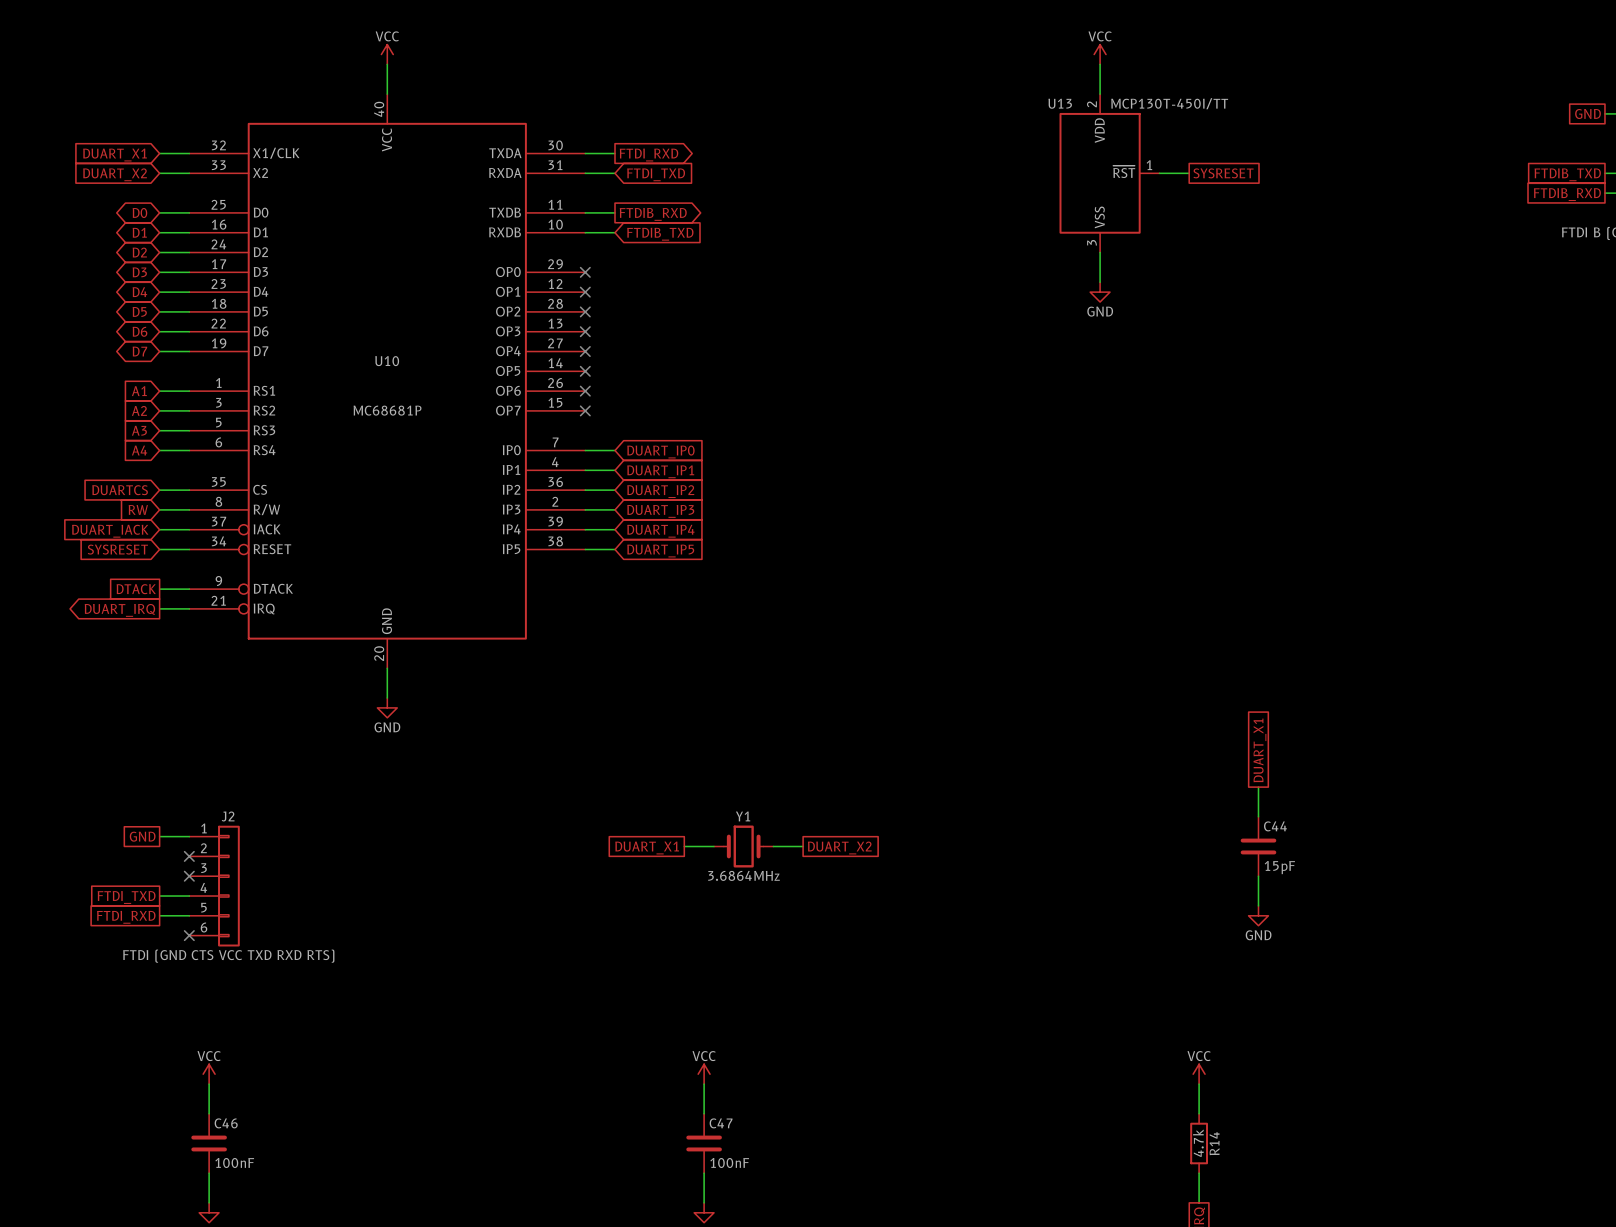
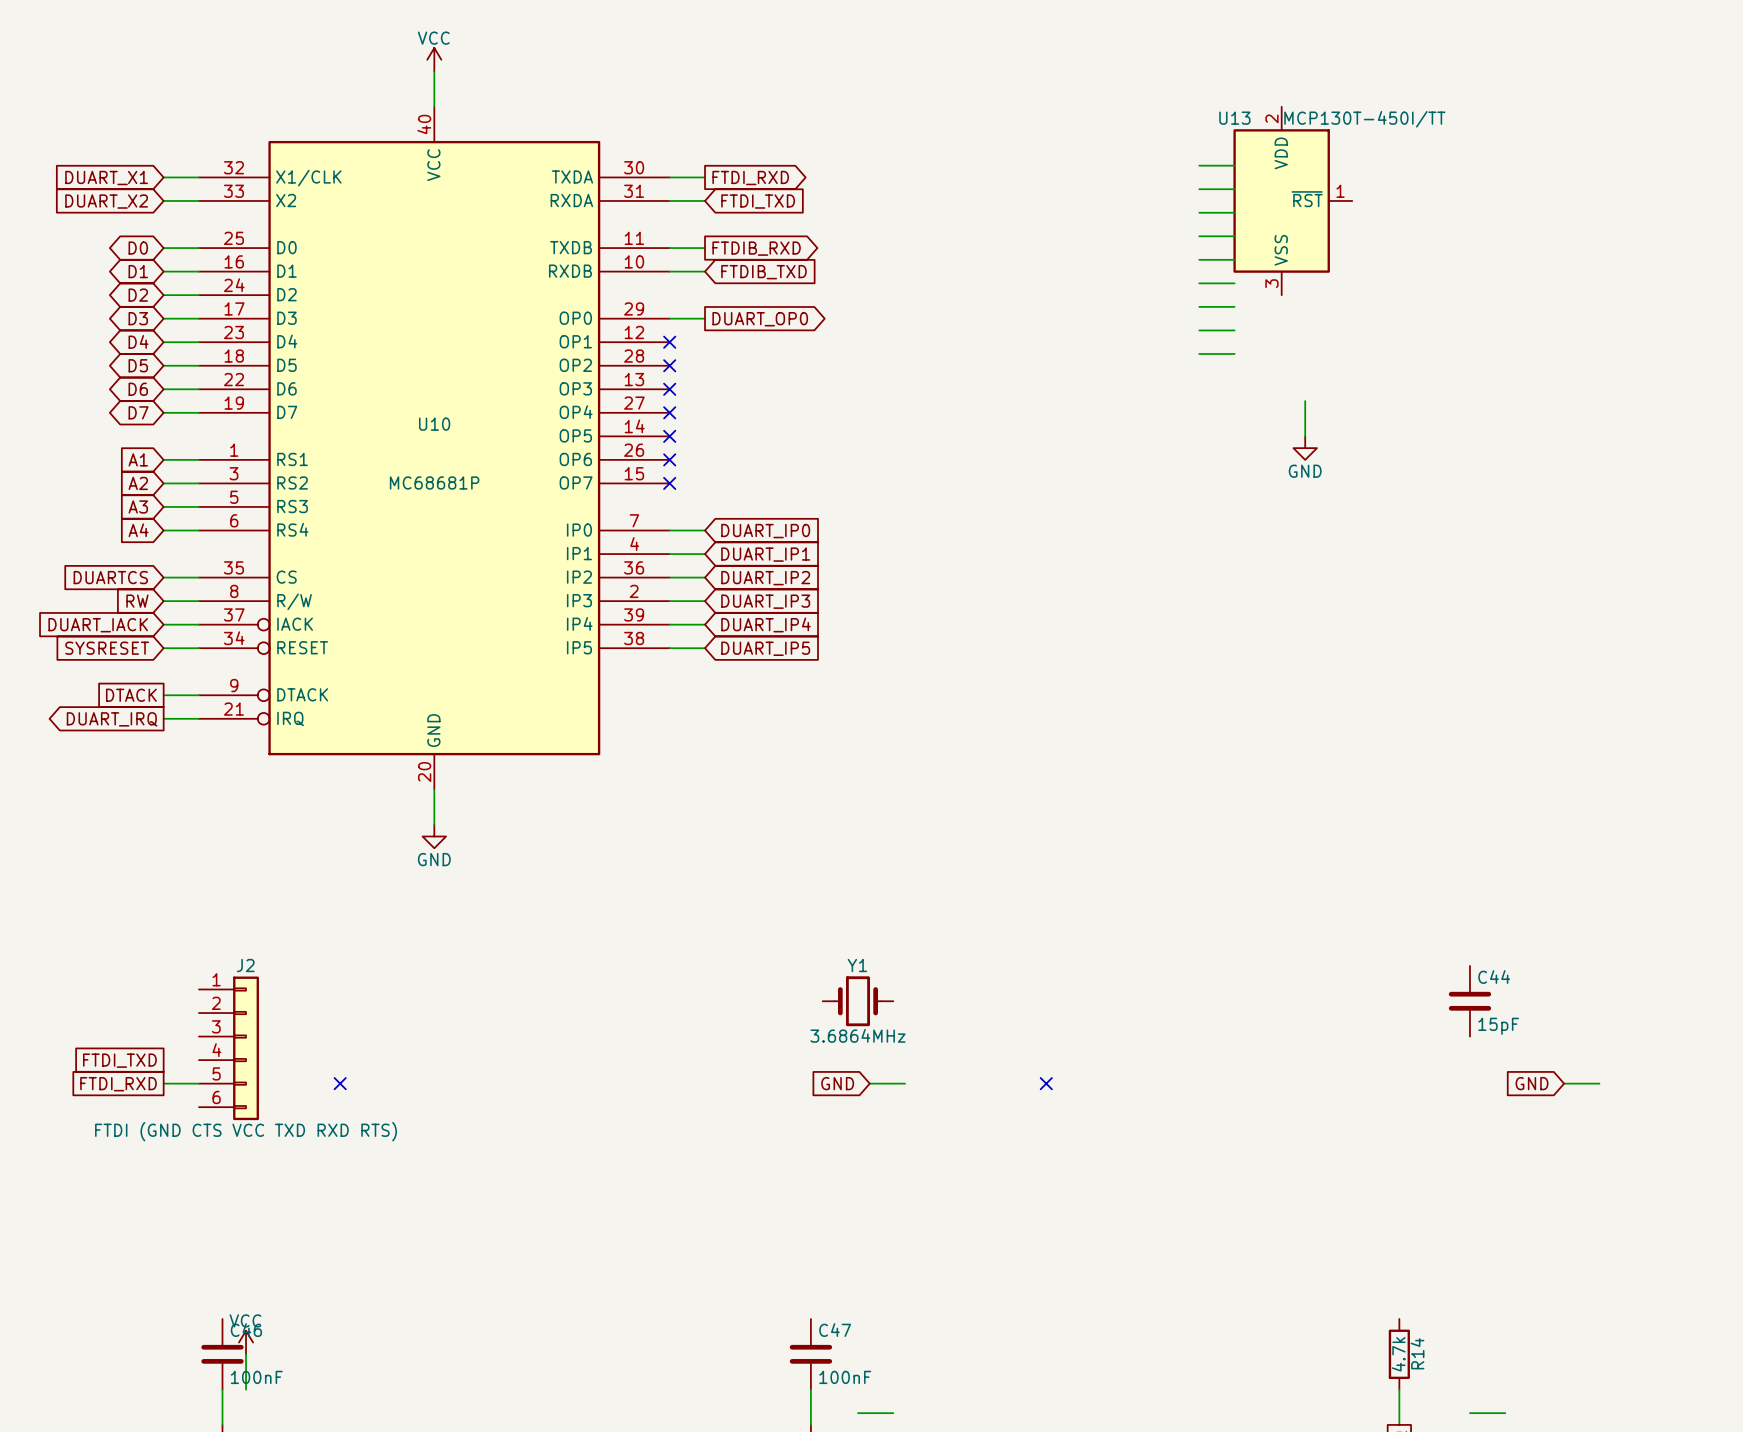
power symbol: VCC (1100, 54) -> none
wire: (1100, 64) (1100, 94) -> none
wire: none -> (1199, 165) (1234, 165)
wire: none -> (1199, 189) (1234, 189)
wire: (1159, 173) (1189, 173) -> (1199, 212) (1234, 212)
global label: SYSRESET (1223, 173) -> none
wire: none -> (1199, 236) (1234, 236)
wire: none -> (1199, 259) (1234, 259)
wire: none -> (1199, 283) (1234, 283)
wire: (1100, 252) (1100, 282) -> (1305, 401) (1305, 436)
wire: none -> (1199, 306) (1234, 306)
wire: none -> (669, 318) (705, 318)
no-connect mark: (585, 272) -> none
global label: none -> DUART_OP0 (760, 319)
wire: none -> (1199, 330) (1234, 330)
power symbol position: GND (1100, 292) -> GND (1305, 448)
wire: none -> (1199, 353) (1234, 353)
global label: DUART_X1 (1259, 750) -> none
wire: (1258, 787) (1258, 816) -> none
global label: GND (142, 836) -> none
wire: (159, 836) (189, 836) -> none
wire: (684, 846) (714, 846) -> (869, 1083) (905, 1083)
wire: (773, 846) (803, 846) -> none
global label: DUART_X1 (647, 847) -> none
global label: DUART_X2 (839, 847) -> none
no-connect mark: (189, 856) -> none
no-connect mark: (189, 876) -> none
wire: (1258, 876) (1258, 905) -> none
wire: (159, 896) (189, 896) -> none
no-connect mark: none -> (340, 1083)
global label: none -> GND (837, 1083)
no-connect mark: none -> (1046, 1083)
power symbol: GND (1258, 915) -> none
global label: none -> GND (1532, 1083)
wire: none -> (1564, 1083) (1599, 1083)
no-connect mark: (189, 935) -> none
power symbol position: VCC (209, 1074) -> VCC (246, 1342)
power symbol: VCC (704, 1074) -> none
power symbol: VCC (1199, 1074) -> none
wire: (209, 1084) (209, 1113) -> (246, 1354) (246, 1389)
wire: (704, 1084) (704, 1113) -> none
wire: (1199, 1084) (1199, 1113) -> none
wire: none -> (858, 1413) (893, 1413)
wire: none -> (1469, 1413) (1505, 1413)

